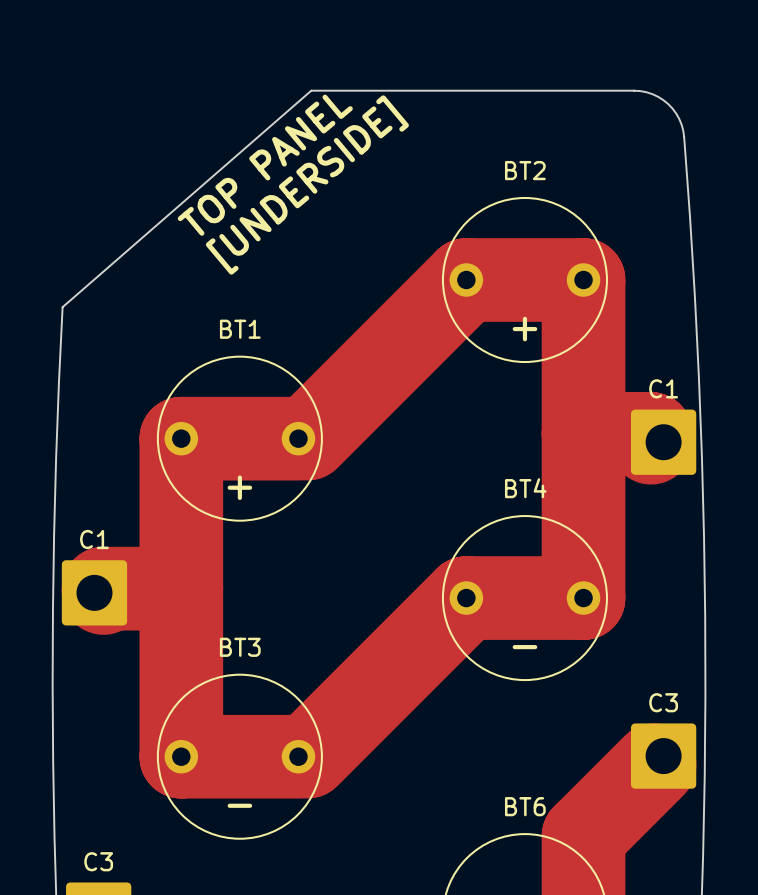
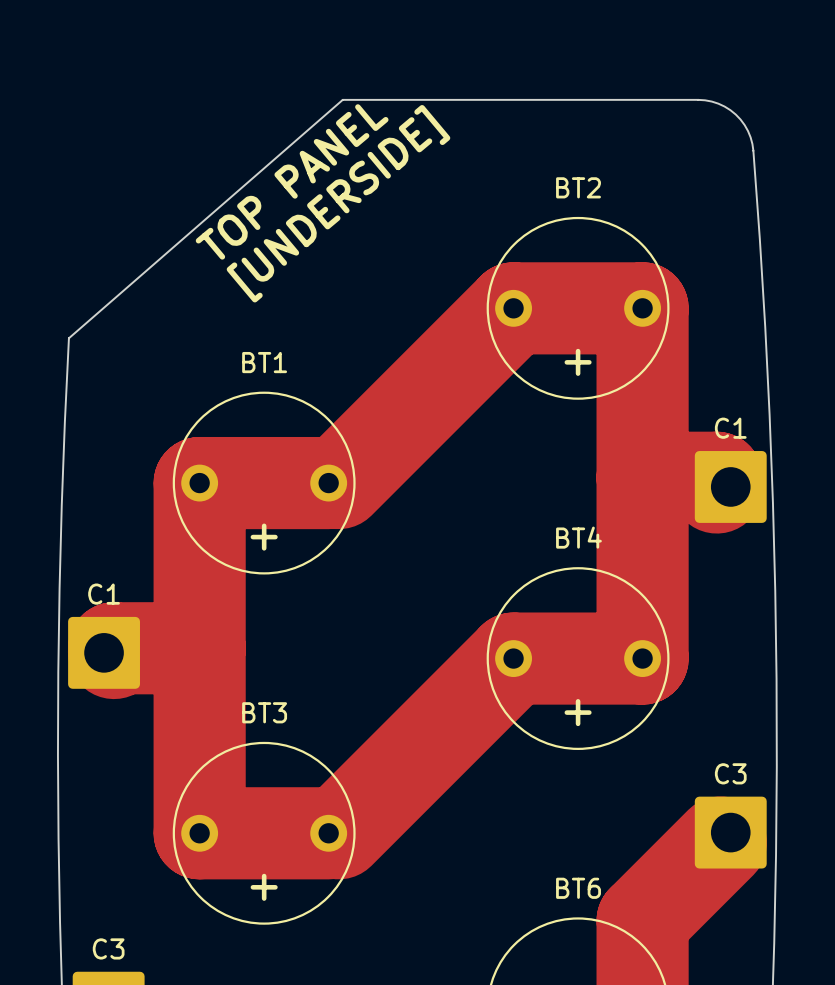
BT4 text: - (524, 647) -> + (578, 712)
BT3 text: - (239, 805) -> + (264, 887)

